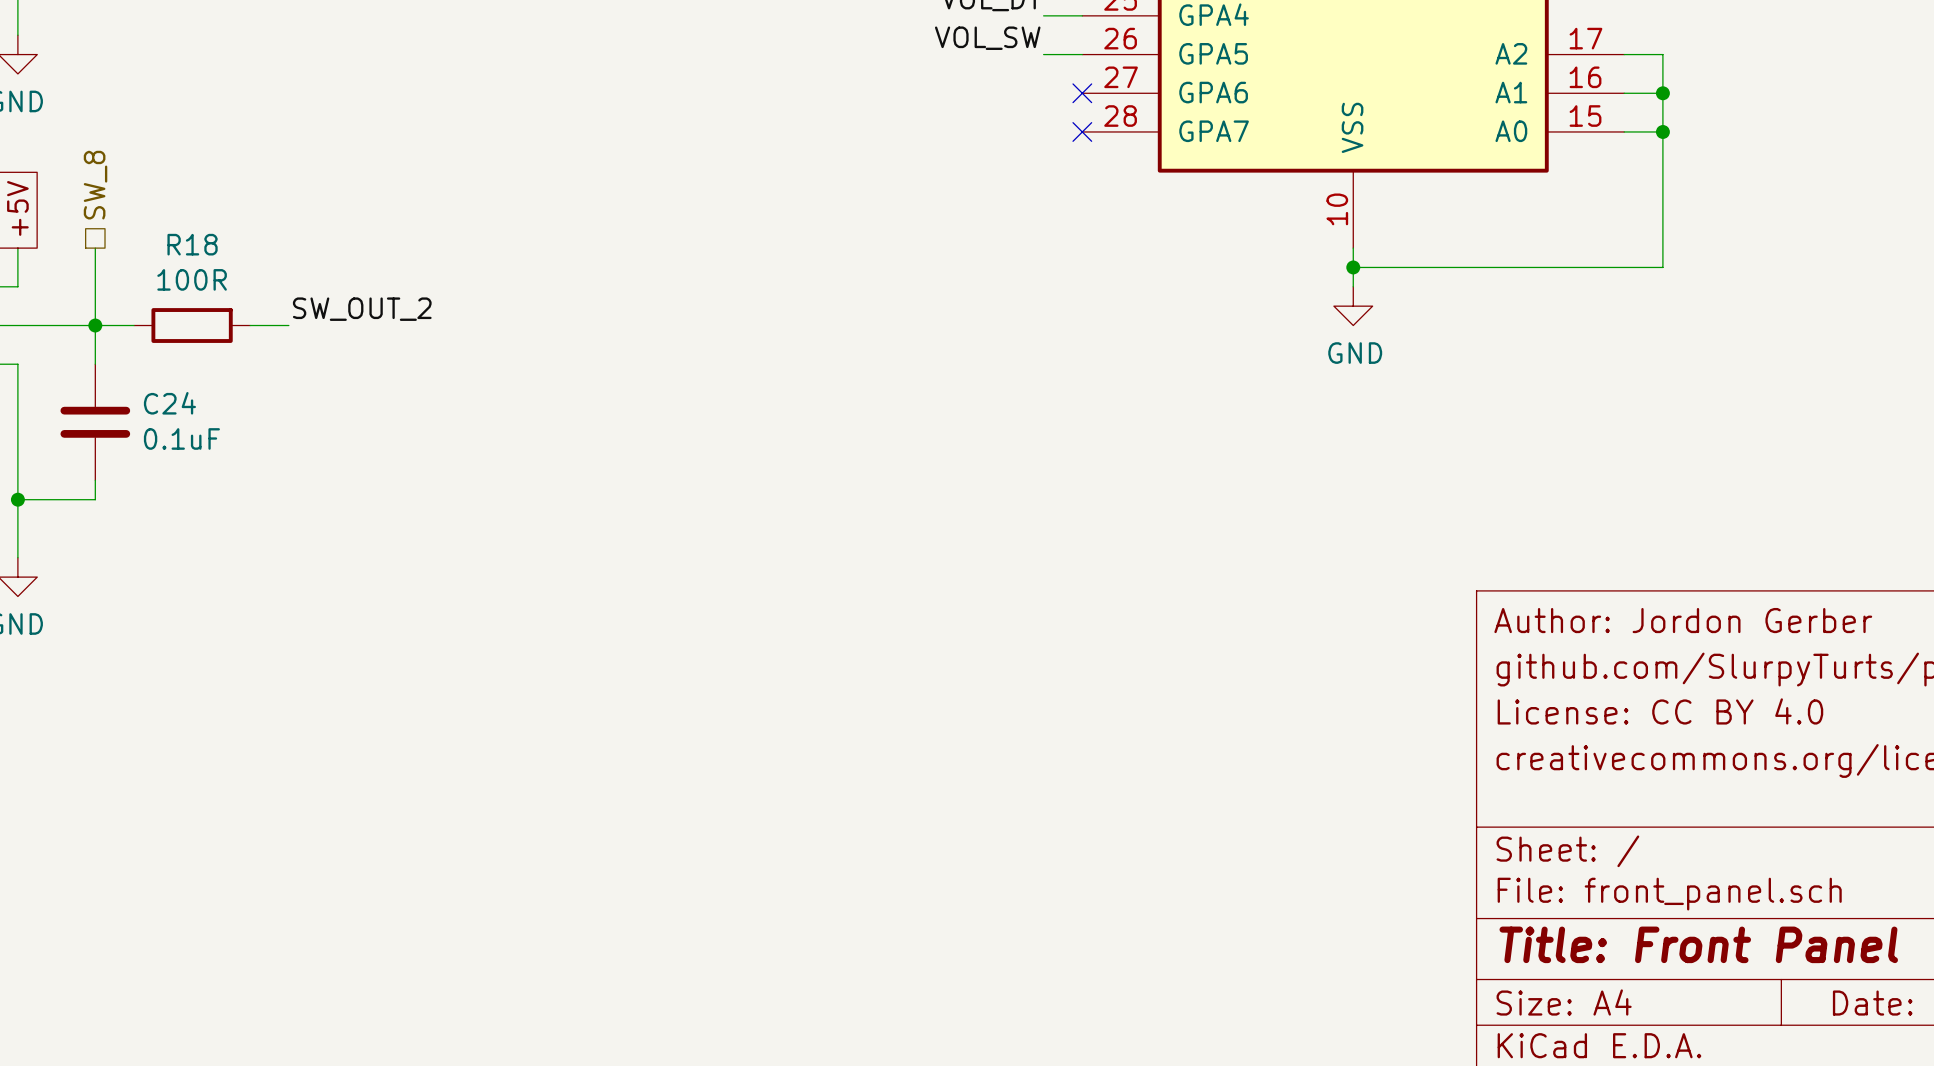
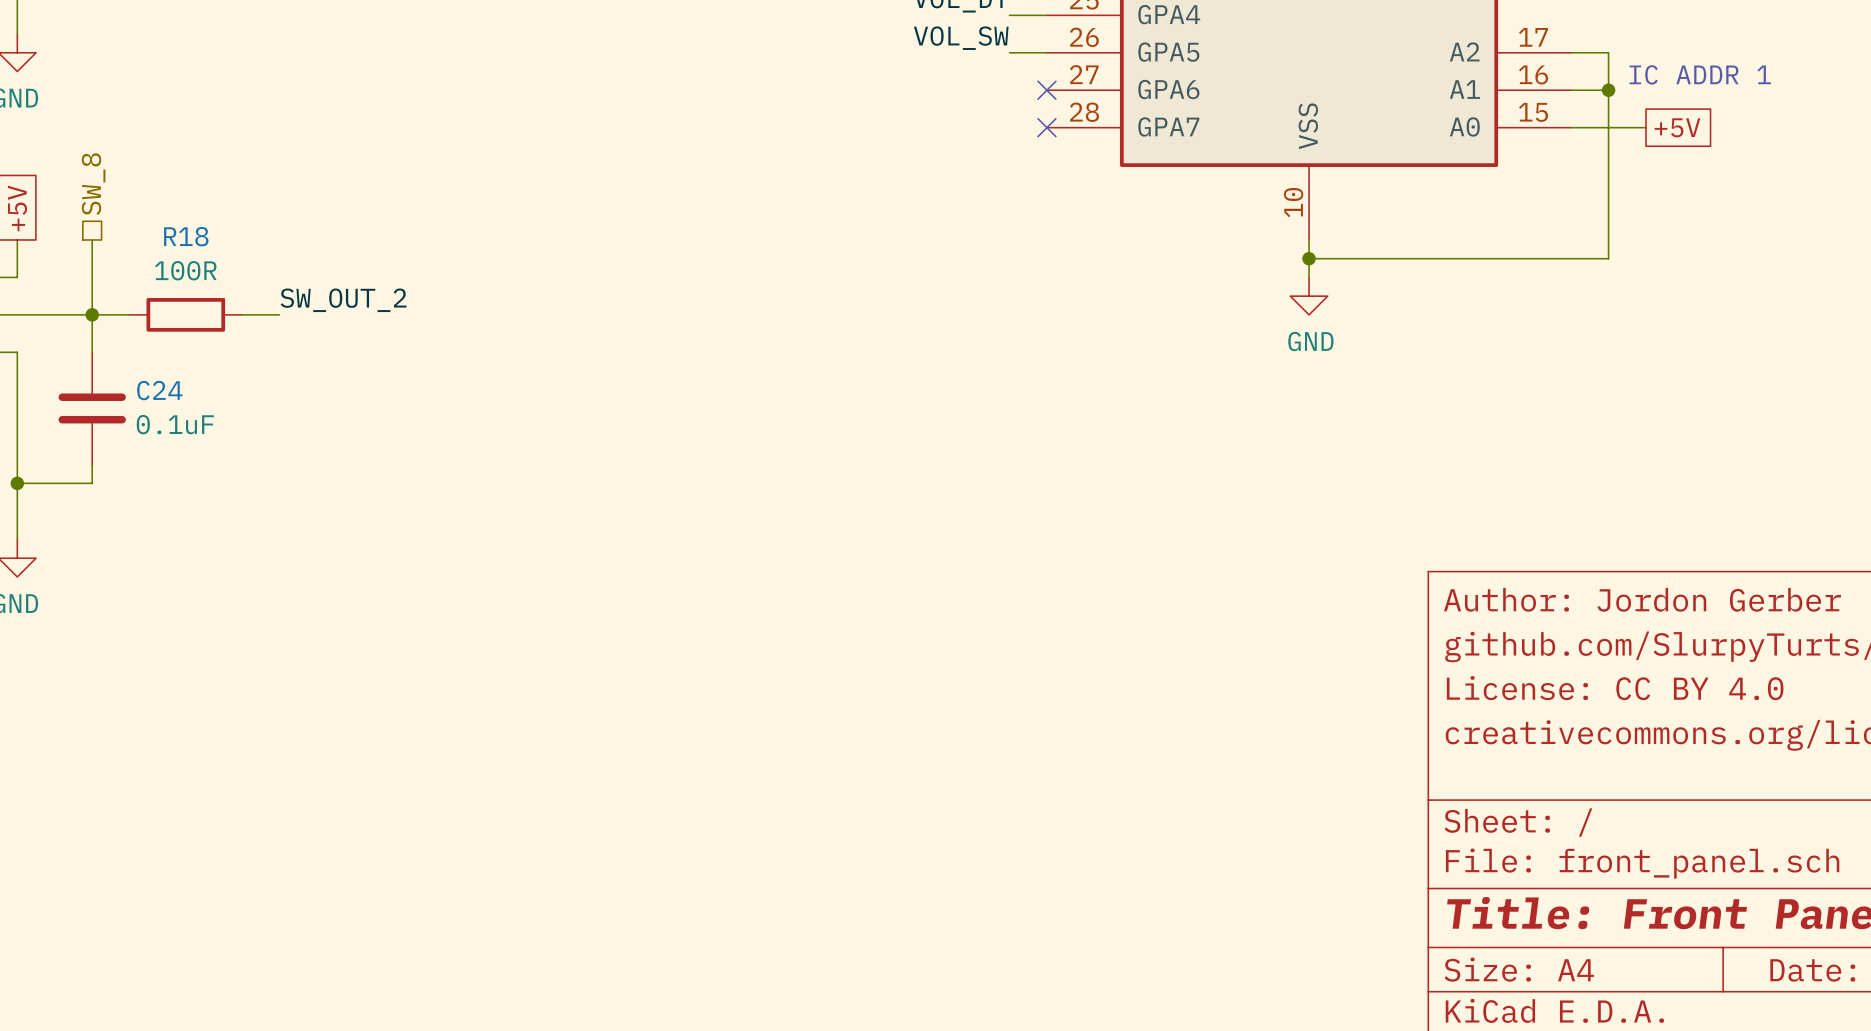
text: none -> IC ADDR 1 (1700, 74)
wire: none -> (1608, 127) (1645, 127)
junction: (1662, 131) -> none
global label: none -> +5V (1677, 127)

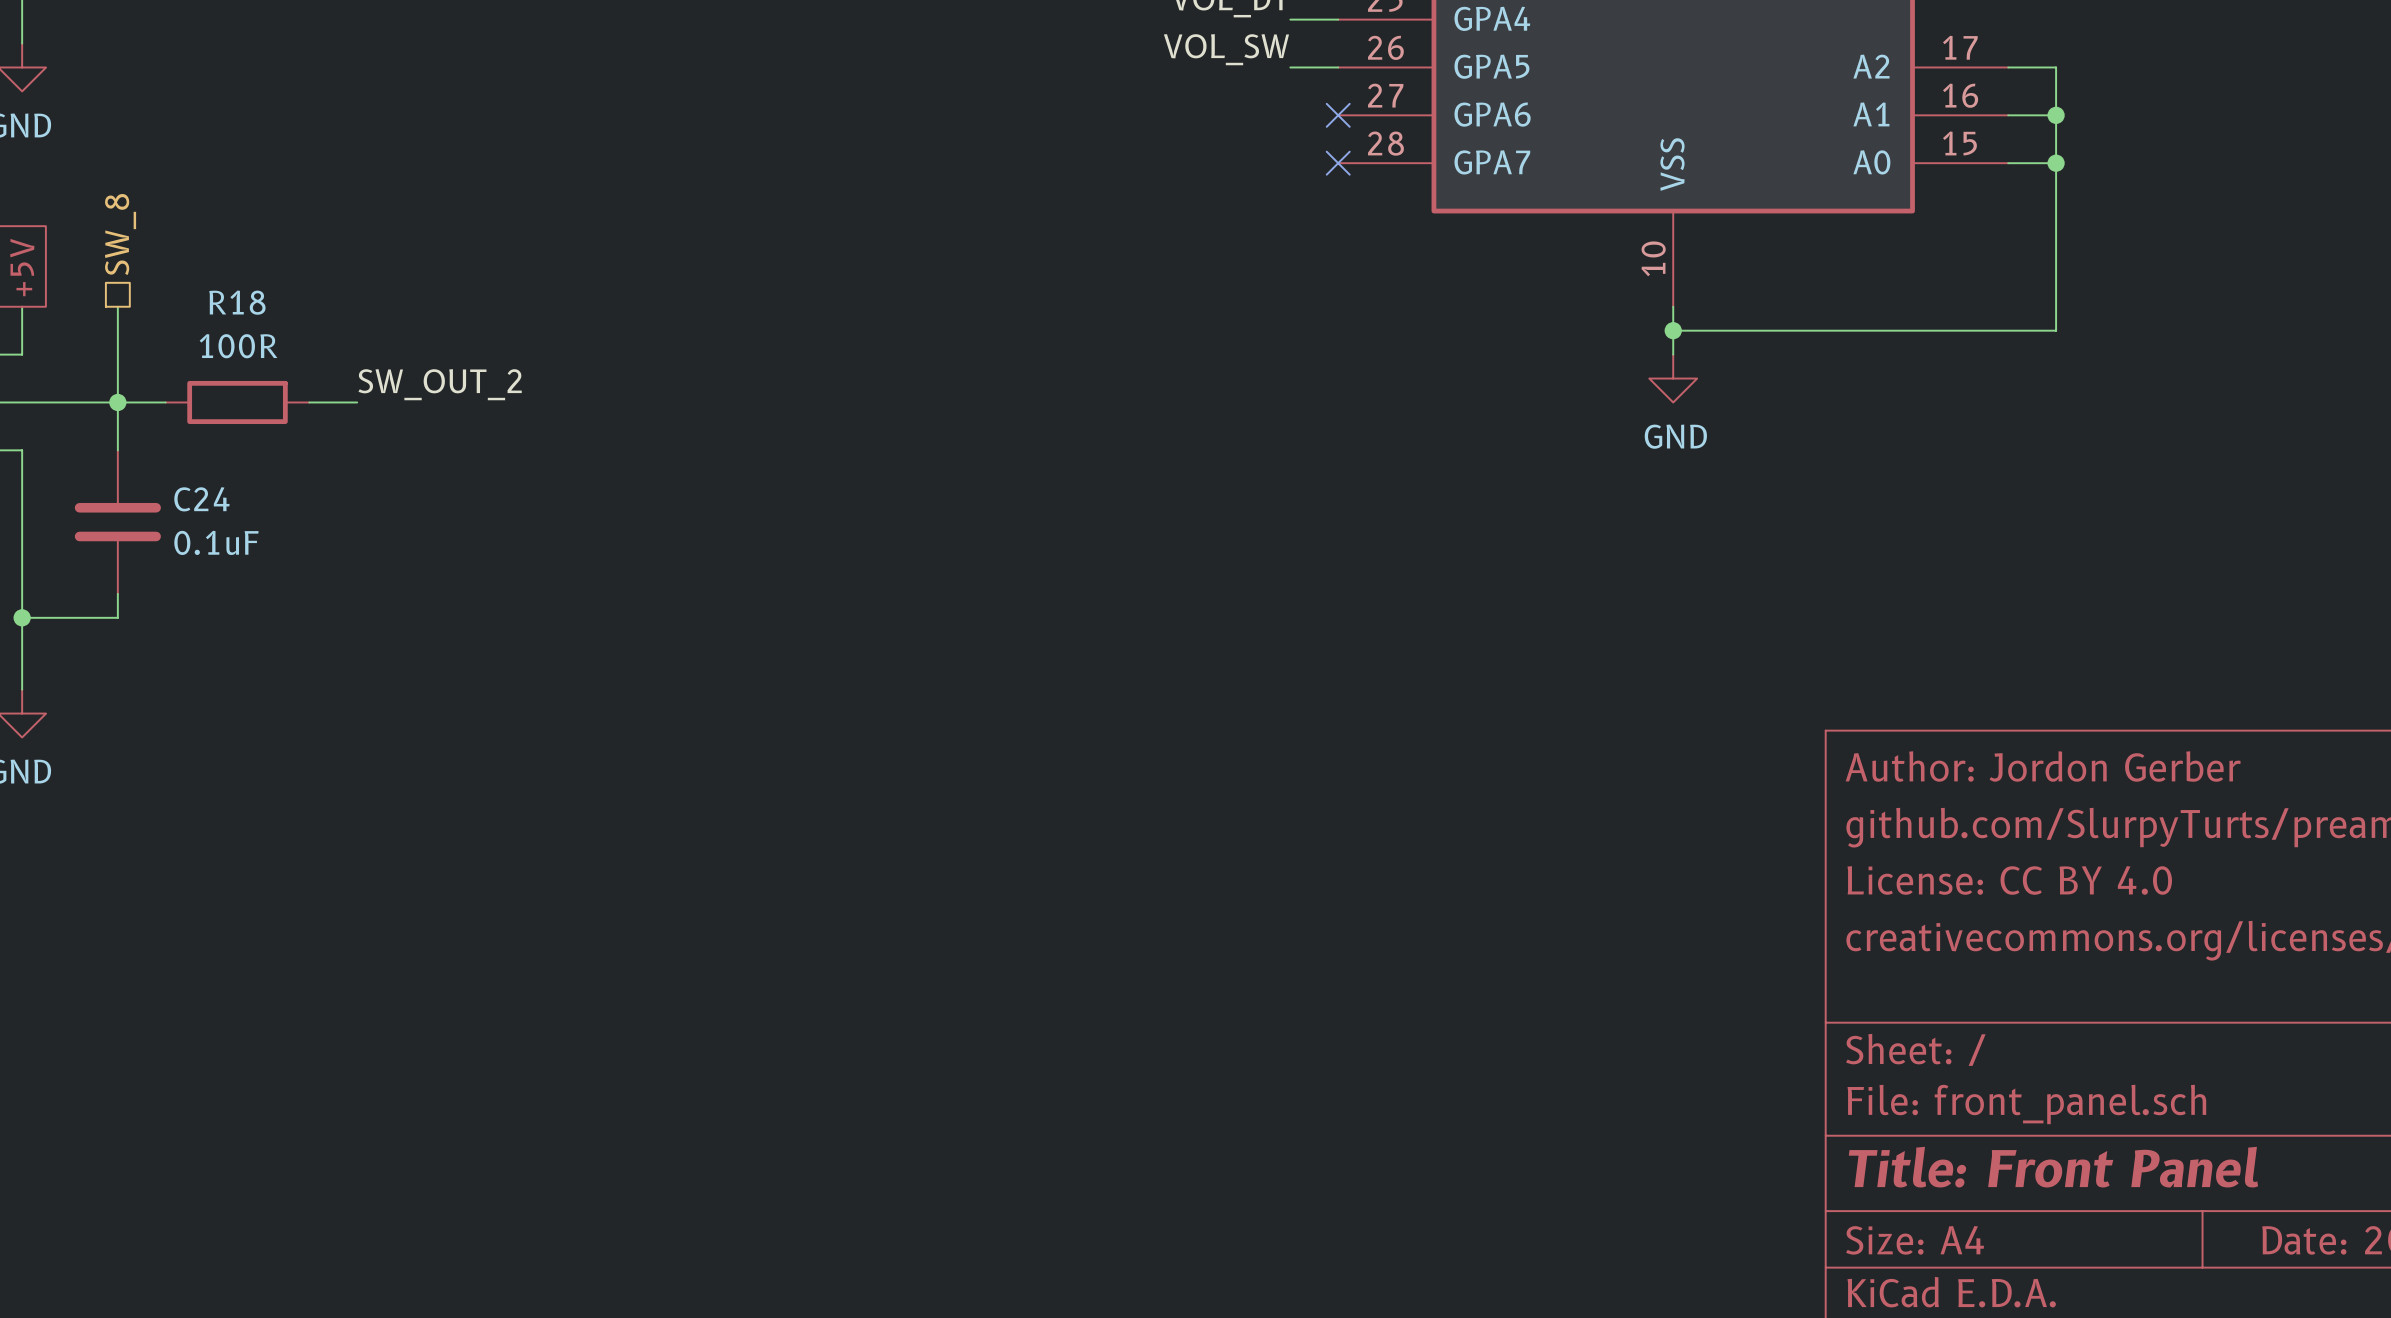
text: IC ADDR 1 (1700, 74) -> none
wire: (1608, 127) (1645, 127) -> none
junction: none -> (2056, 163)
global label: +5V (1677, 127) -> none

